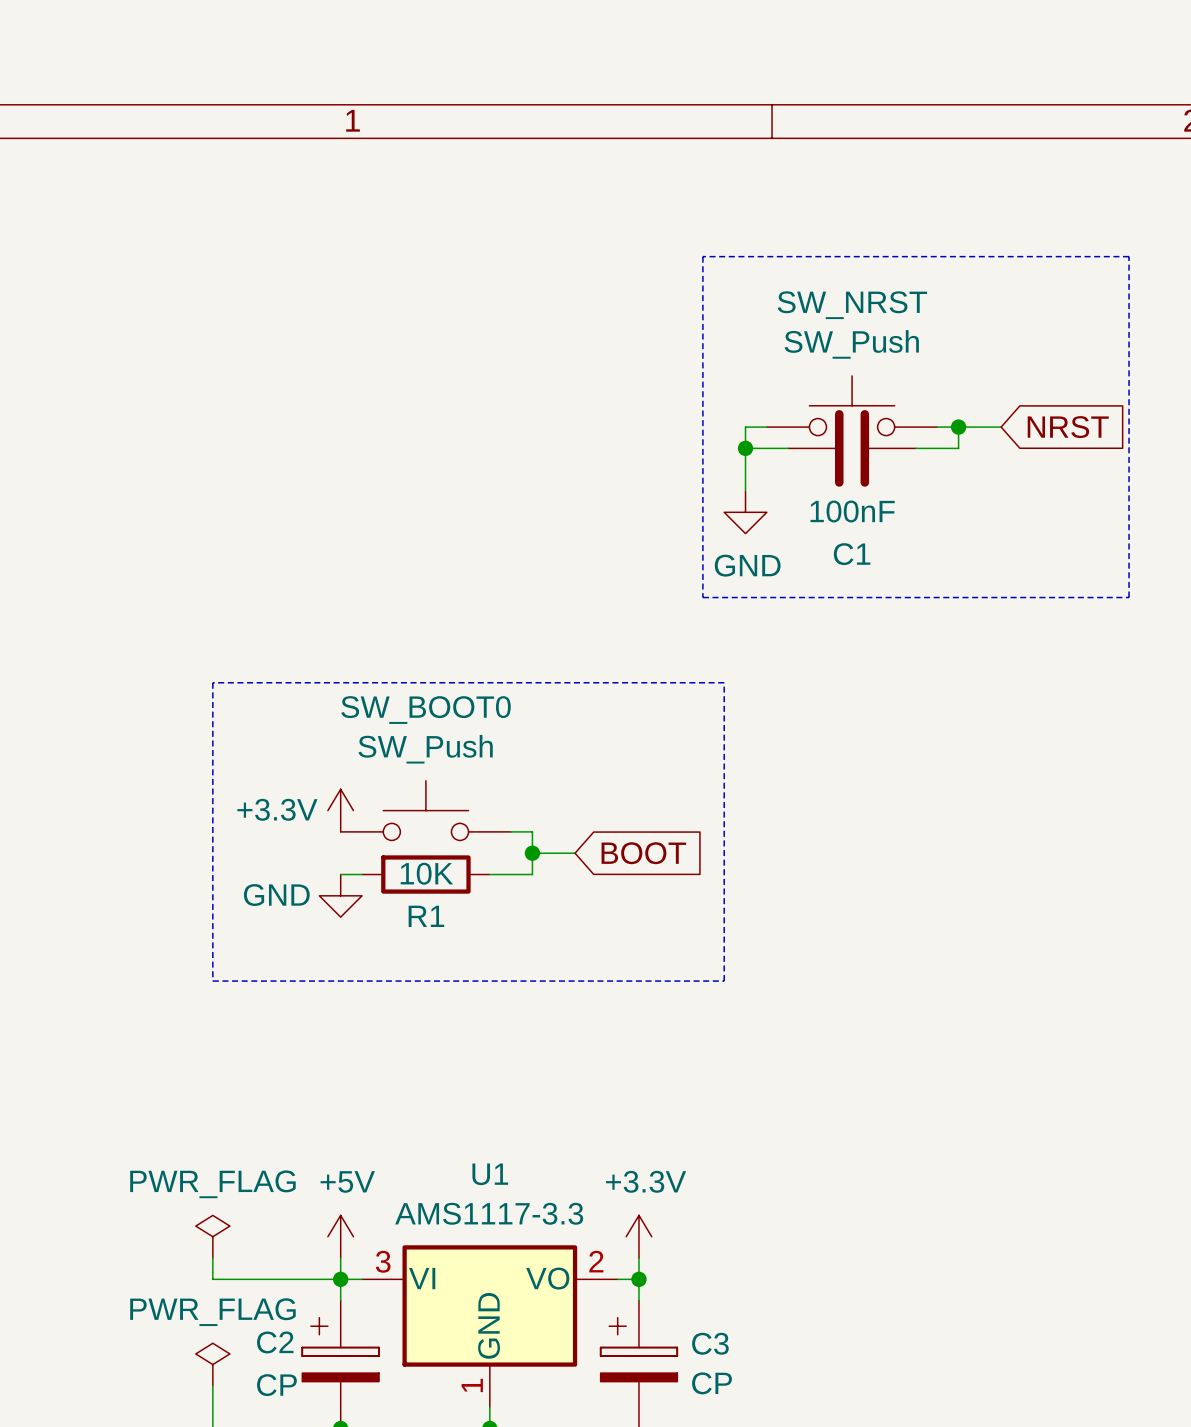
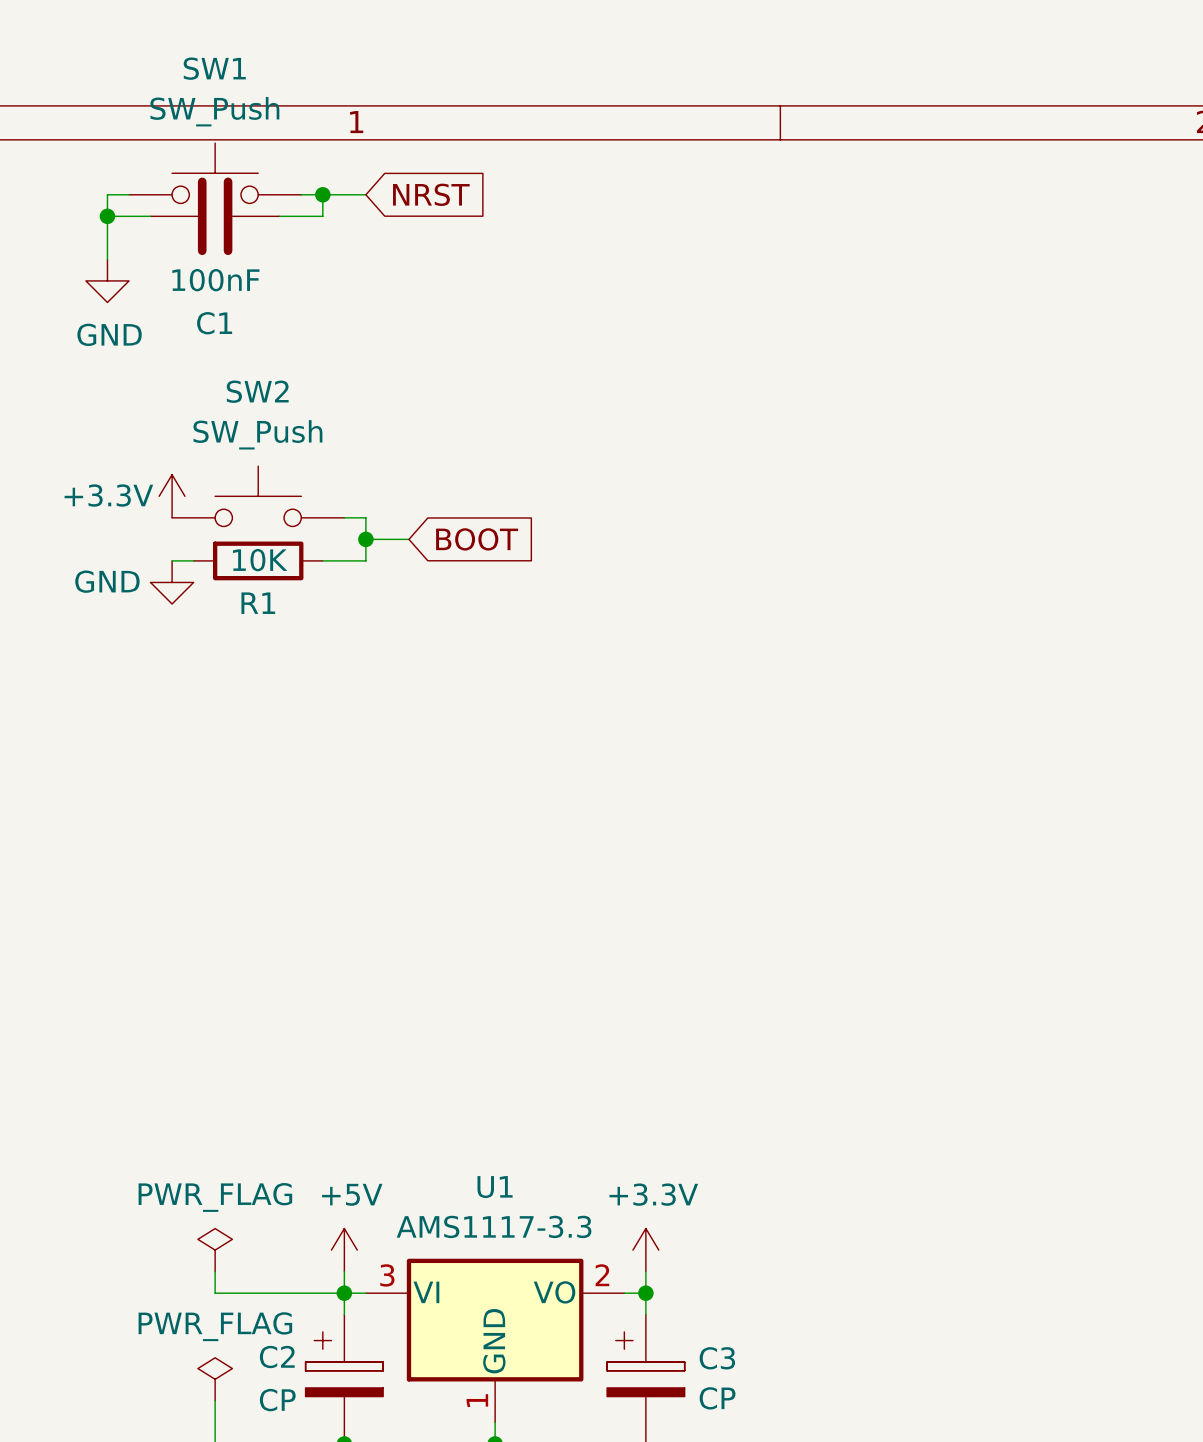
SW1: none -> SW_Push (215, 173)
wire: none -> (128, 194) (107, 194) (107, 259)
wire: none -> (301, 194) (365, 194)
wire: none -> (322, 194) (322, 216) (279, 216)
junction: none -> (322, 194)
global label: none -> NRST (431, 194)
wire: none -> (107, 216) (150, 216)
junction: none -> (107, 216)
line: (702, 256) (1129, 256) (1129, 597) (702, 597) (702, 256) -> none
power symbol: none -> GND (107, 280)
SW_NRST: SW_Push (852, 405) -> none
wire: (766, 427) (745, 427) (745, 491) -> none
wire: (937, 427) (1001, 427) -> none
wire: (958, 427) (958, 448) (915, 448) -> none
junction: (958, 427) -> none
global label: NRST (1068, 427) -> none
wire: (745, 448) (788, 448) -> none
junction: (745, 448) -> none
C1 position: (852, 448) -> (215, 216)
SW2: none -> SW_Push (258, 496)
power symbol: GND (745, 512) -> none
junction: none -> (365, 539)
power symbol: none -> GND (172, 582)
line: (212, 682) (212, 981) (724, 981) (724, 682) (212, 682) -> none
power symbol position: +3.3V (340, 810) -> +3.3V (172, 496)
SW_BOOT0: SW_Push (425, 810) -> none
wire: (511, 831) (532, 831) (532, 874) (489, 874) -> (344, 517) (365, 517) (365, 560) (322, 560)
wire: (532, 853) (575, 853) -> (365, 539) (408, 539)
junction: (532, 853) -> none
global label position: BOOT (643, 853) -> BOOT (477, 539)
wire: (340, 874) (361, 874) -> (172, 560) (193, 560)
R1 position: (425, 874) -> (258, 560)
power symbol: GND (340, 895) -> none

